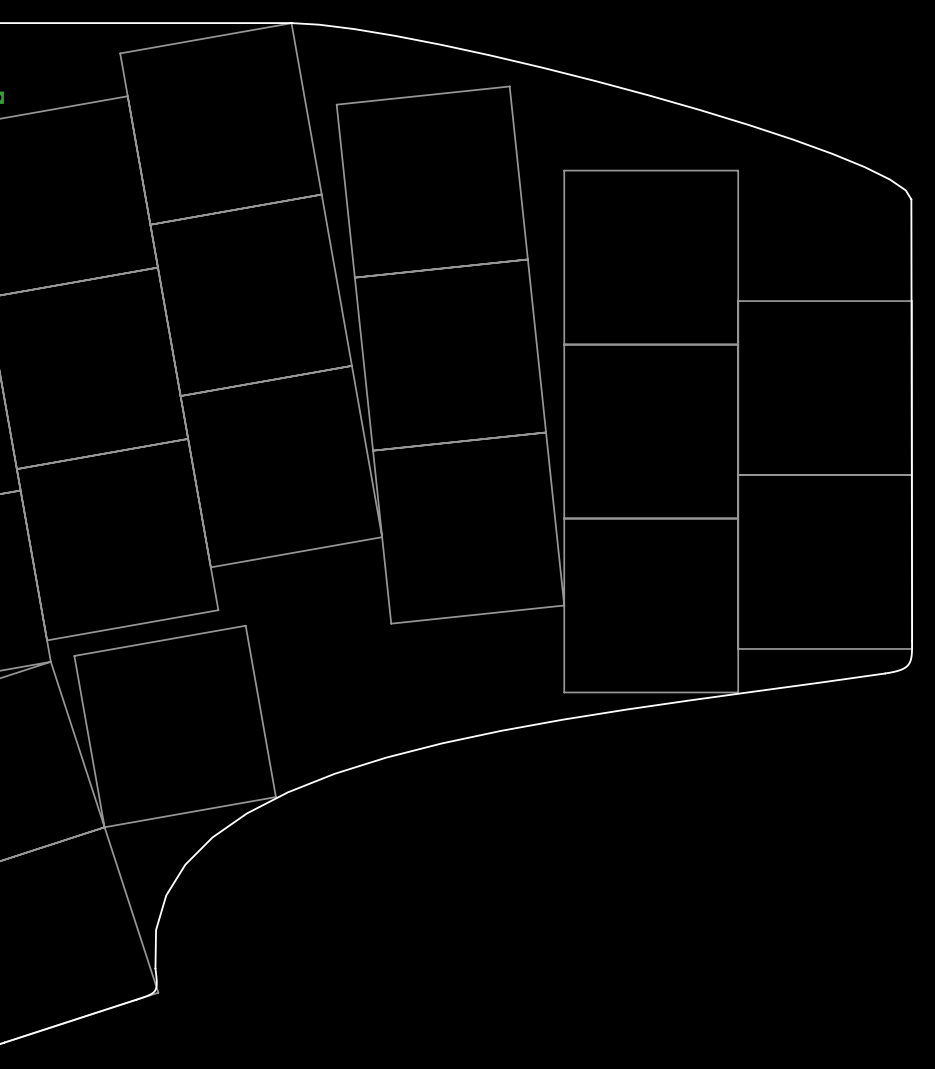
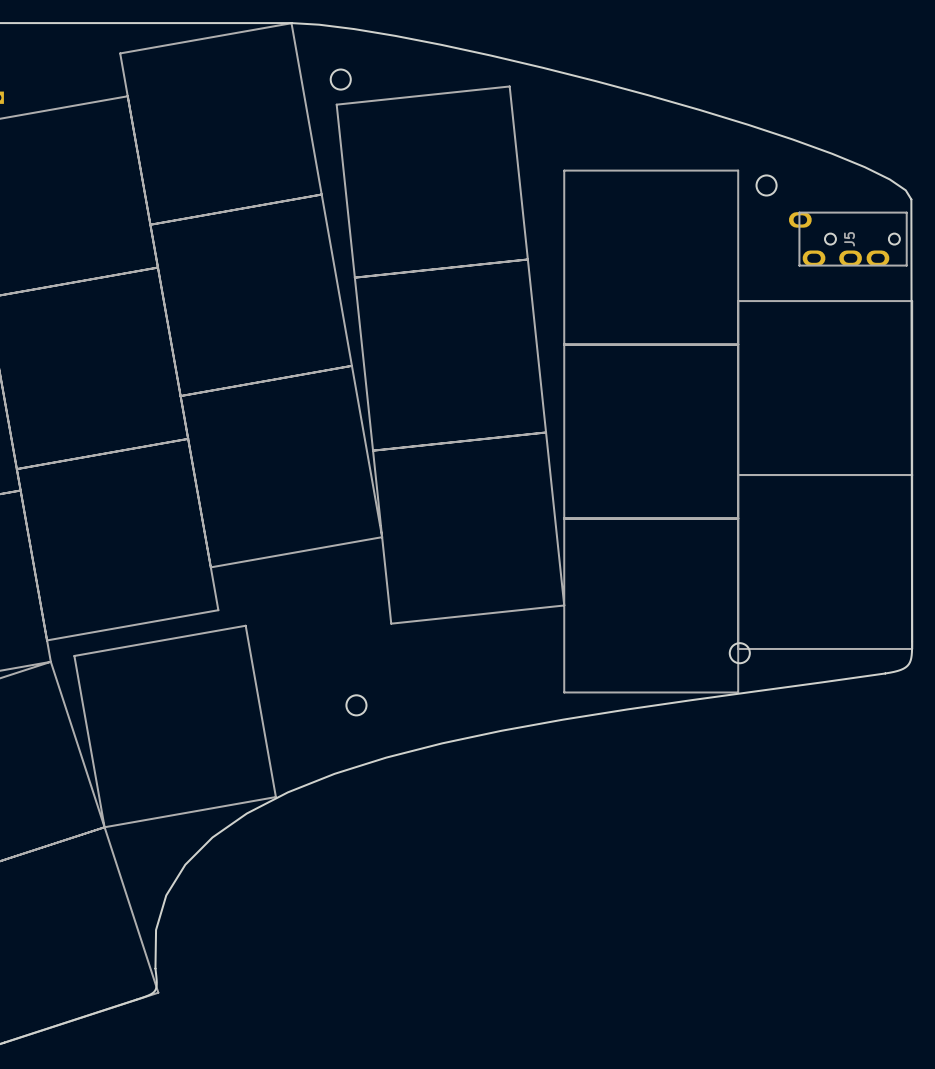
round board edge: none -> [330, 69, 352, 91]
round board edge: none -> [756, 174, 778, 196]
J5: none -> (848, 239)
round board edge: none -> [729, 642, 751, 664]
round board edge: none -> [345, 694, 367, 716]

